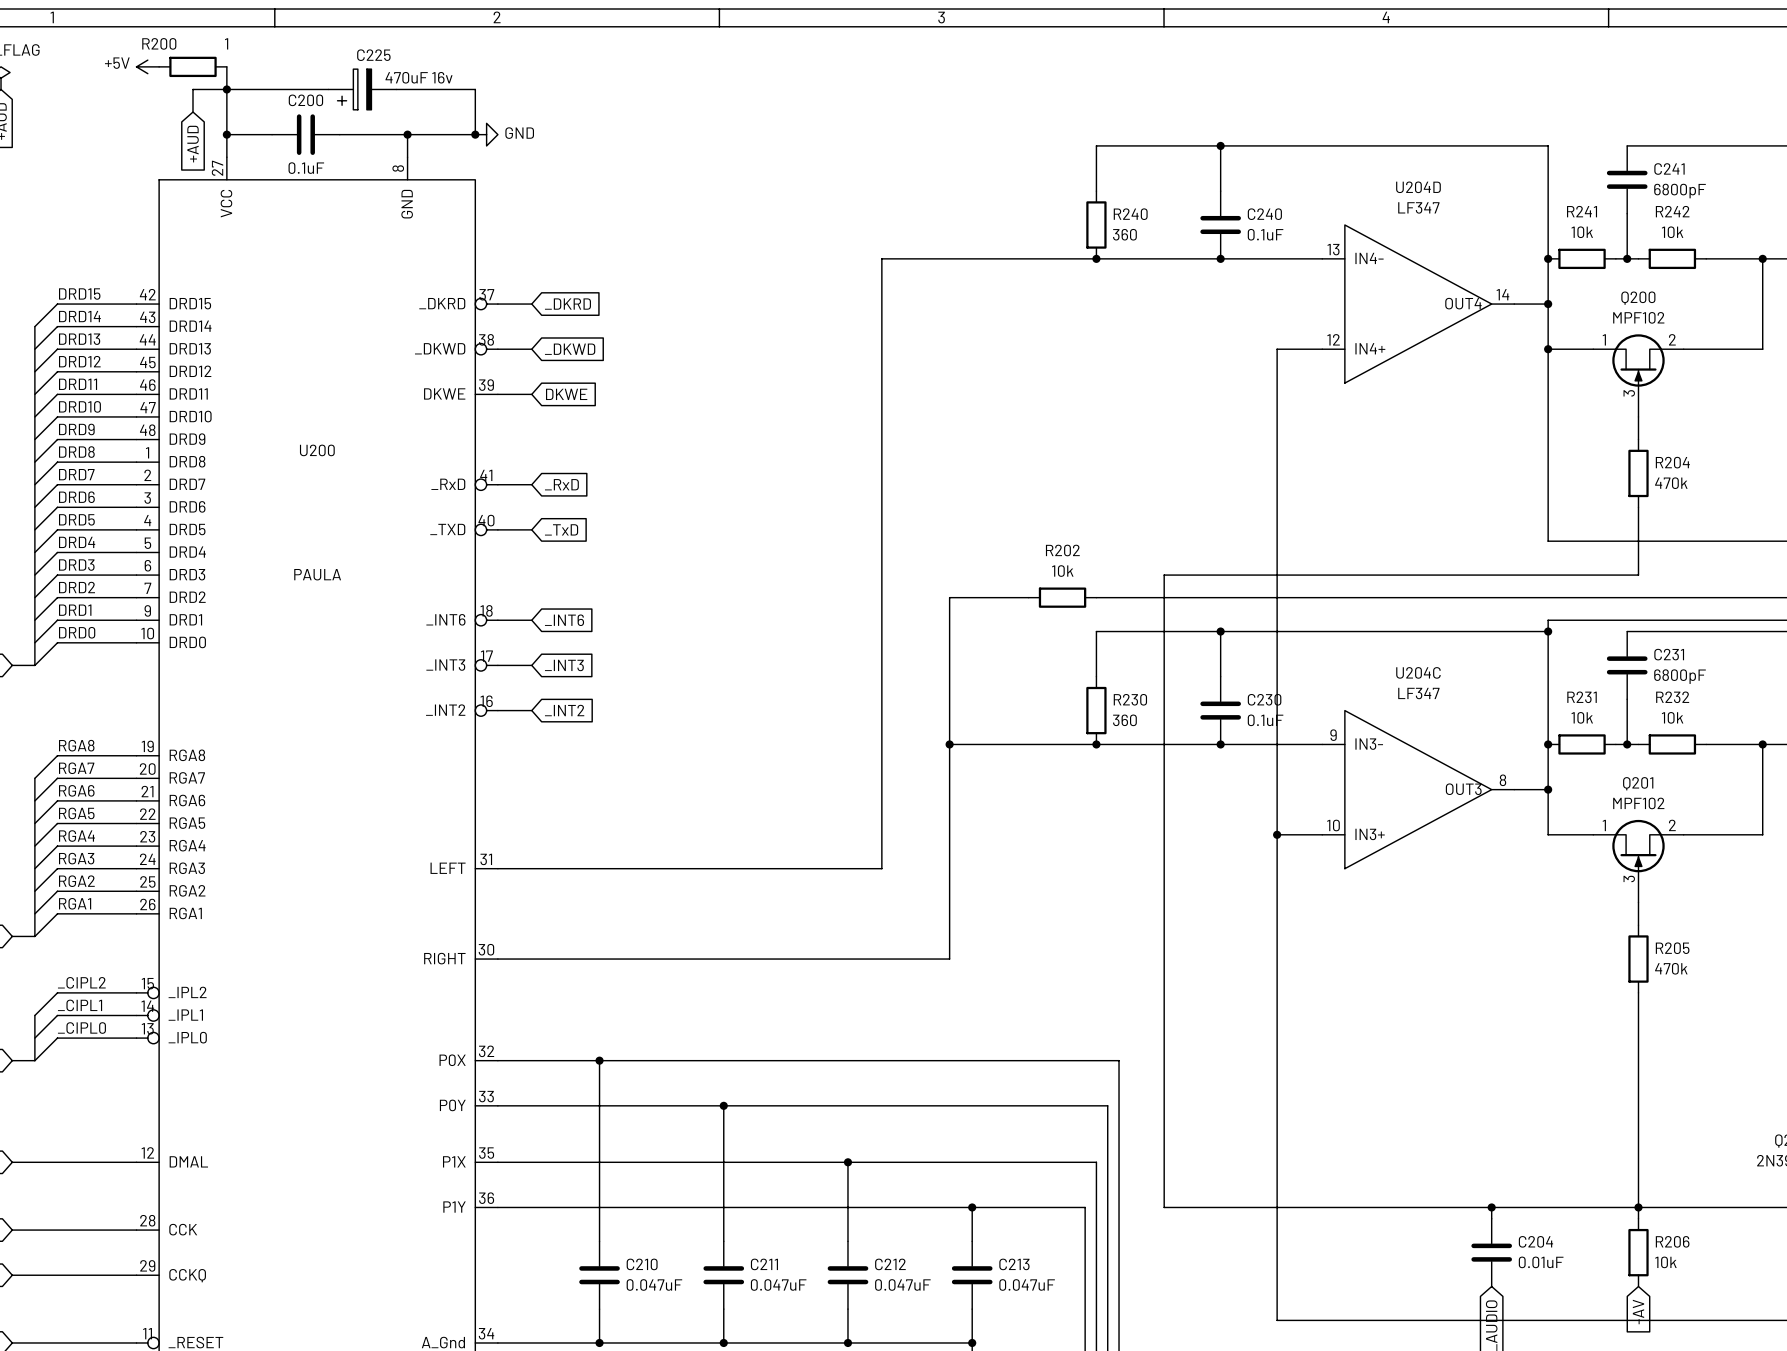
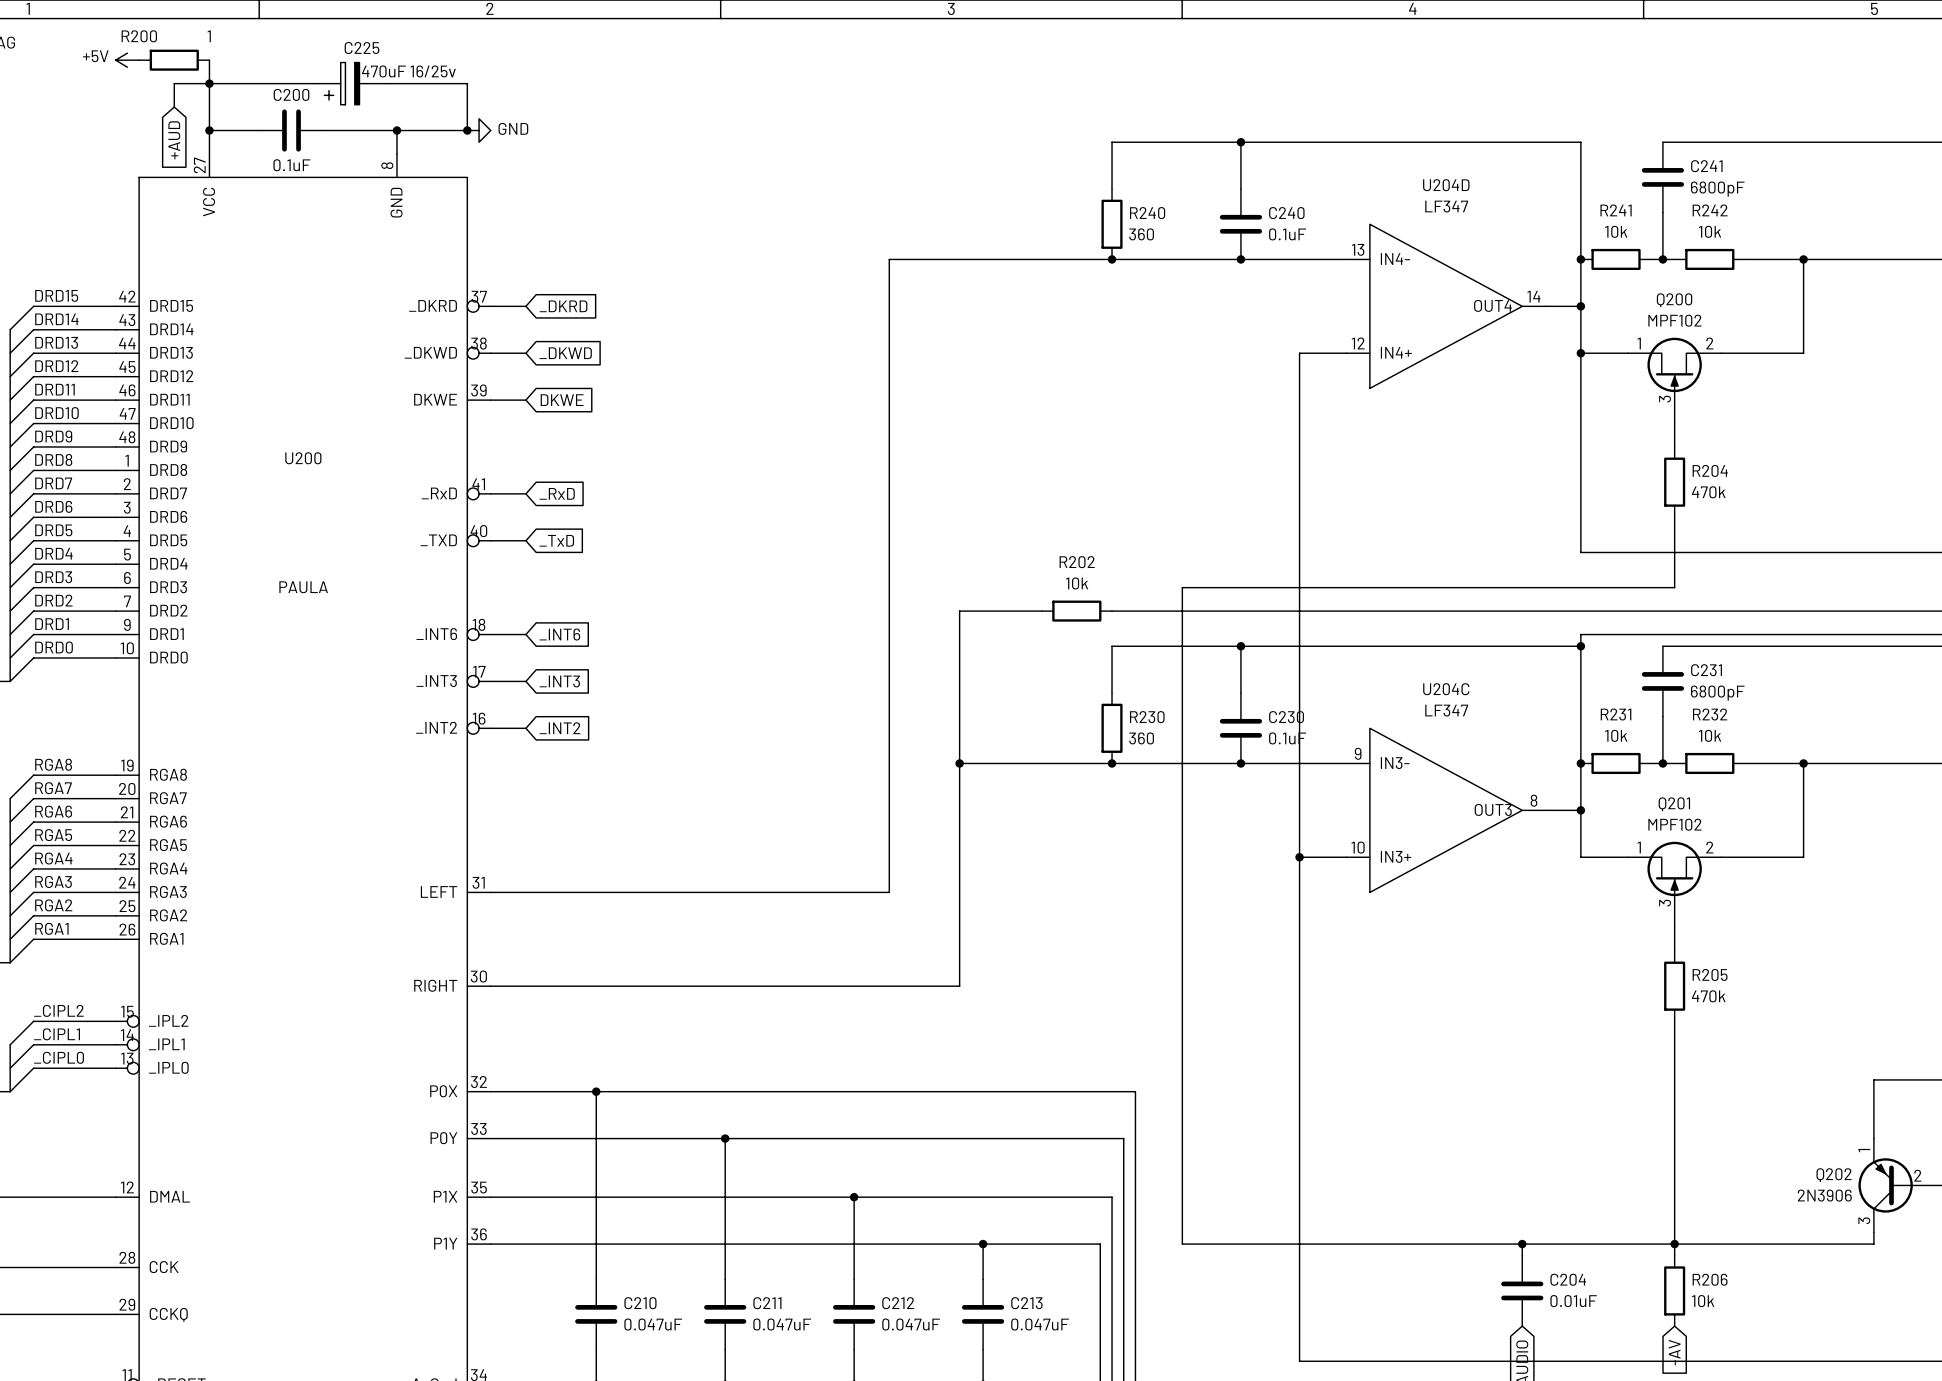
C225 value: 470uF 16v (419, 77) -> 470uF 16/25v (408, 71)

